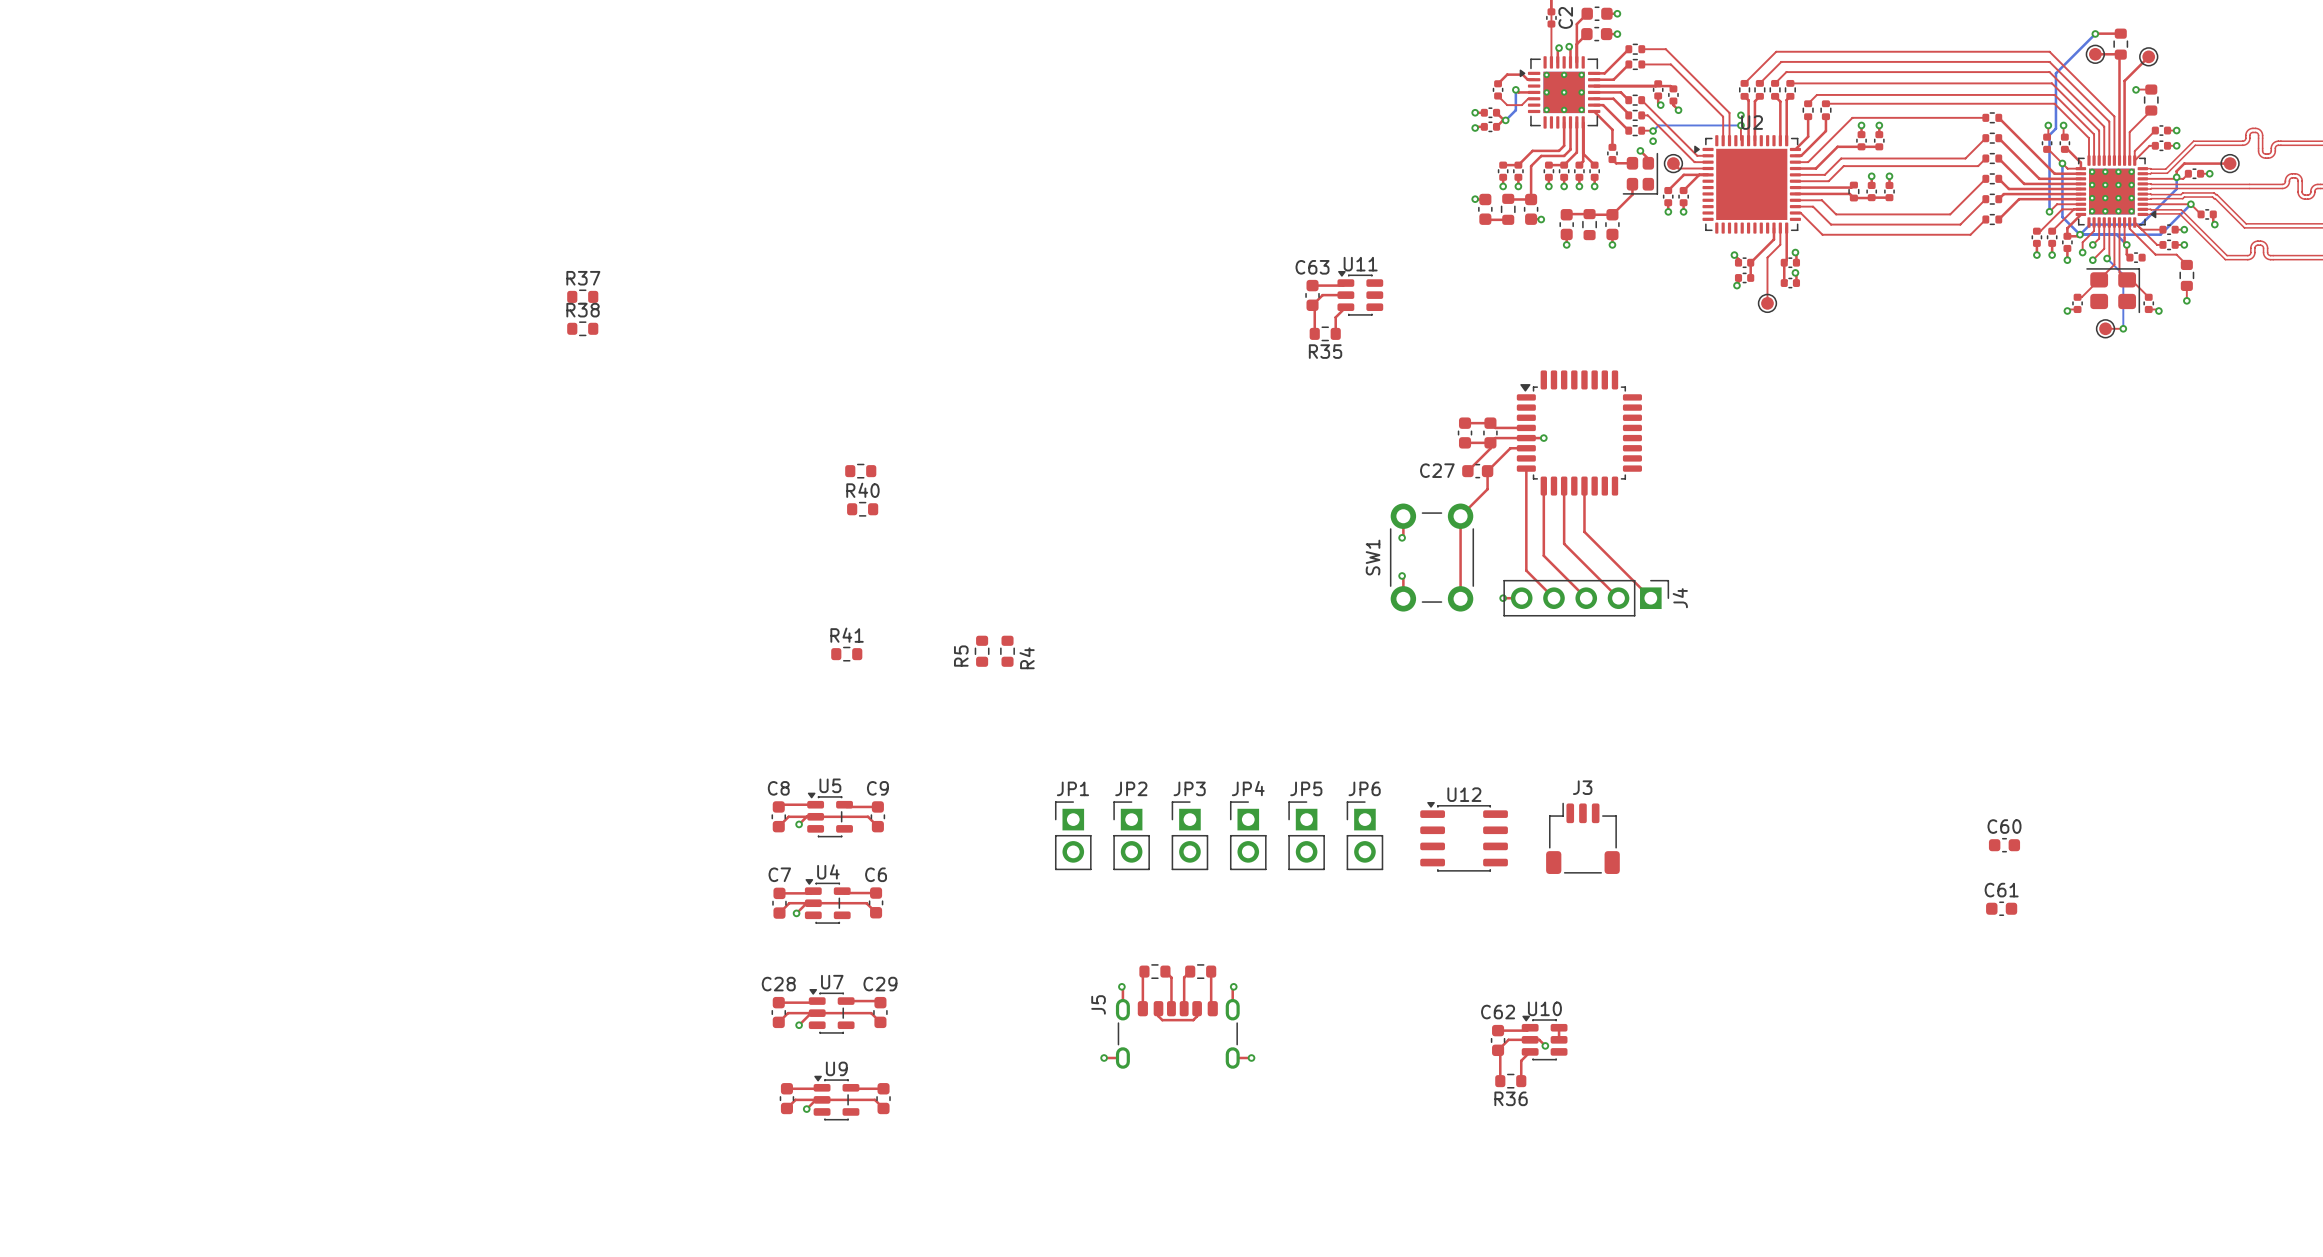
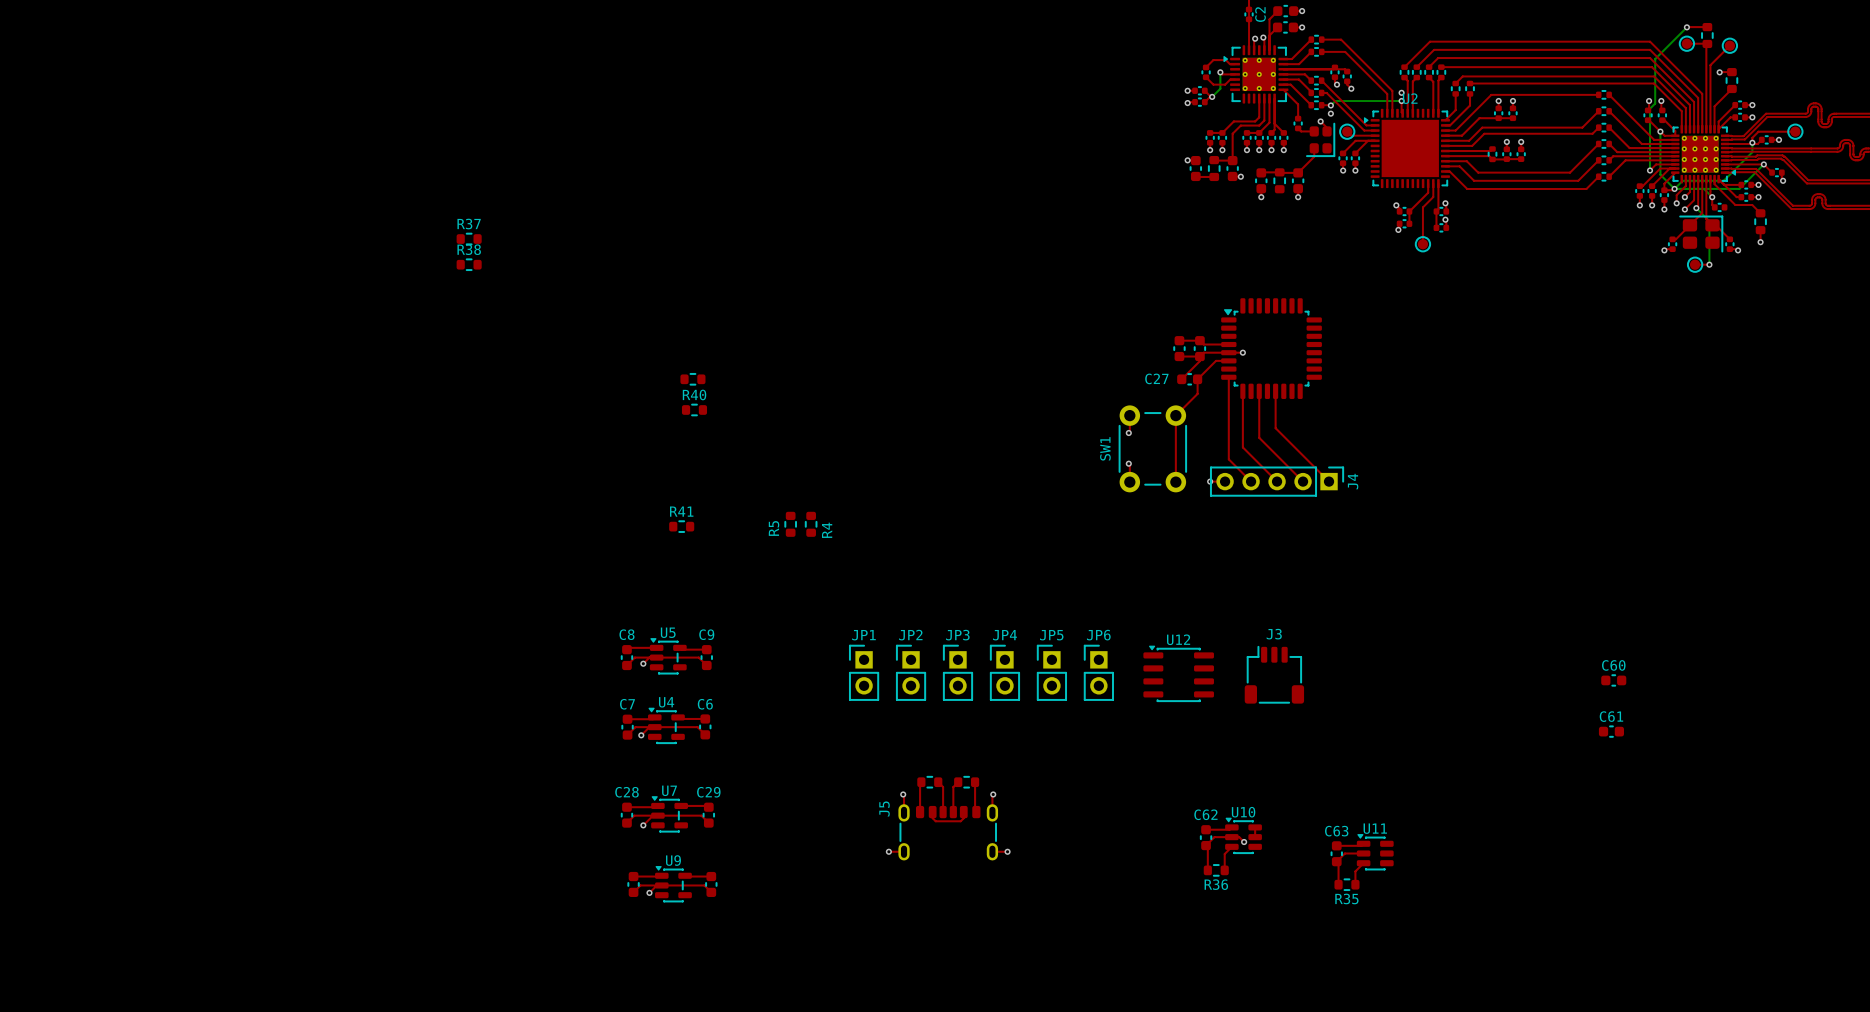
top track: (1345, 283) (1343, 285) (1312, 285) -> none
U11 position: (1360, 293) -> (1375, 852)
C63 position: (1312, 295) -> (1336, 853)
top track: (1345, 295) (1322, 295) (1312, 305) (1314, 308) (1314, 333) -> none
top track: (1345, 307) (1335, 317) (1335, 333) -> none
R35 position: (1325, 333) -> (1346, 884)
top track: none -> (1363, 843) (1361, 845) (1336, 845)
top track: none -> (1363, 853) (1344, 853) (1336, 861) (1338, 863) (1338, 884)
top track: none -> (1363, 863) (1355, 871) (1355, 884)

